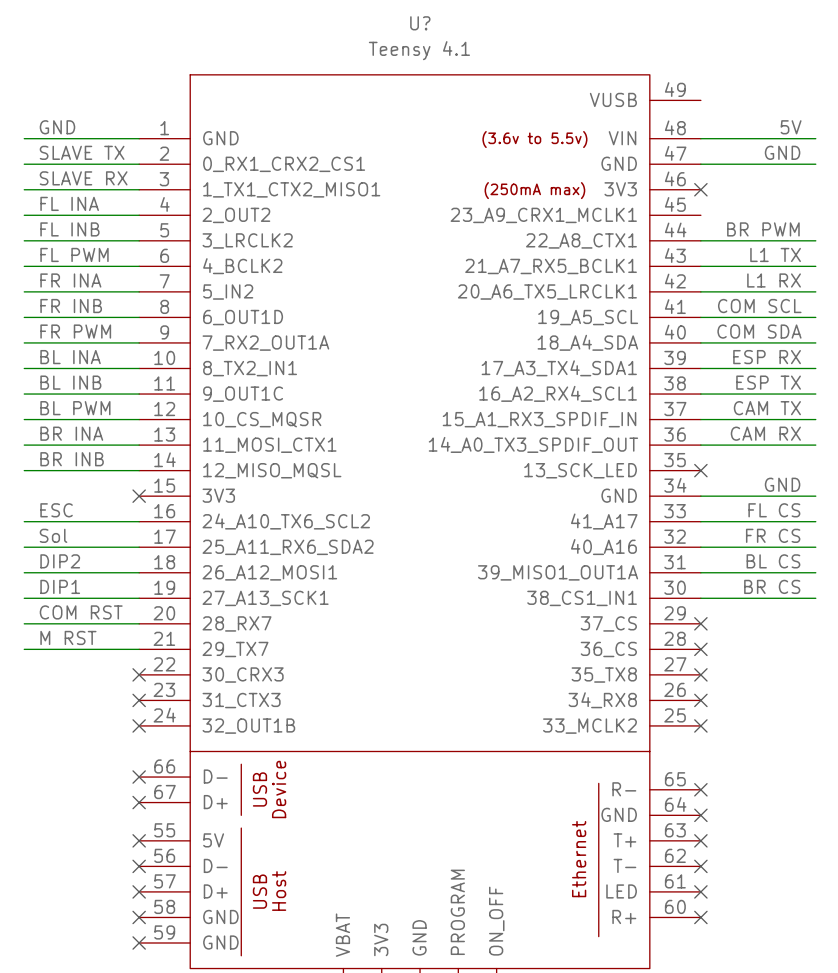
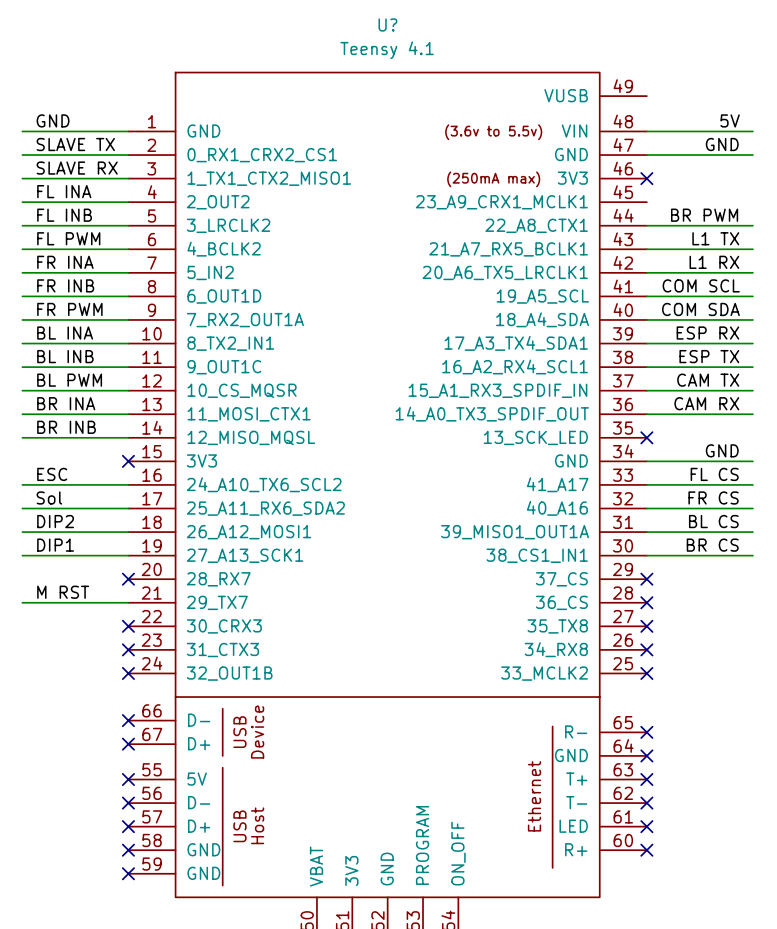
label: COM RST (81, 612) -> none
wire: (24, 623) (139, 623) -> none
no-connect mark: none -> (128, 579)

